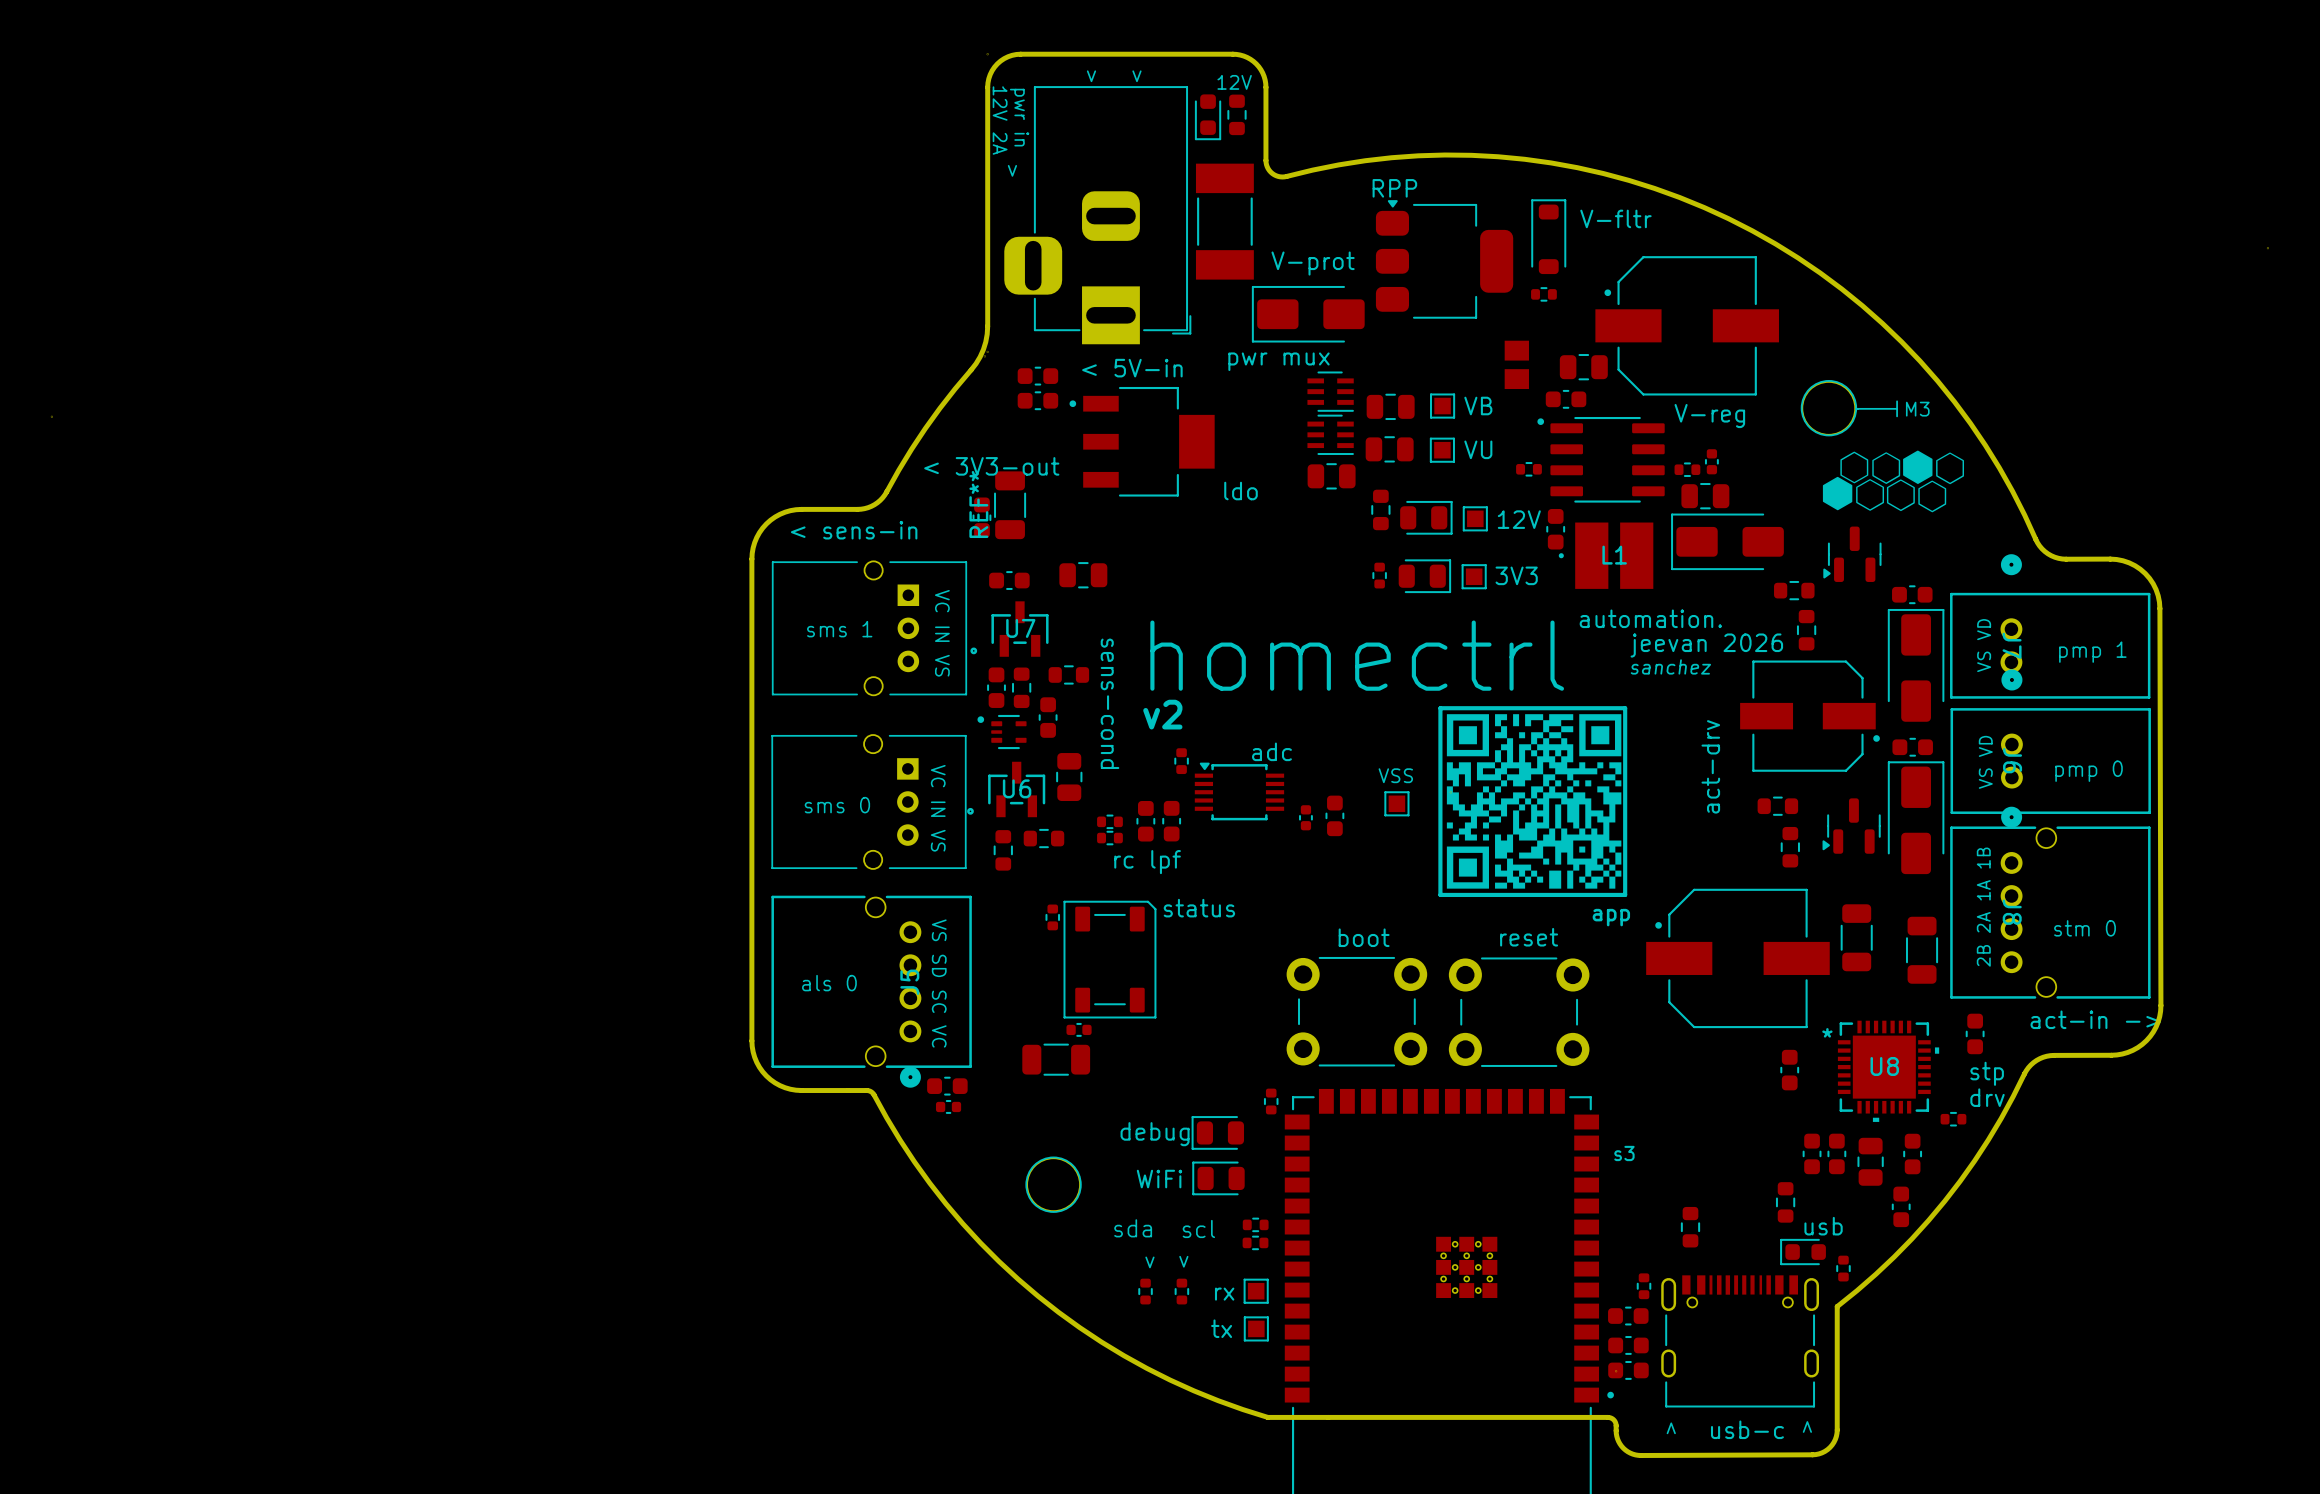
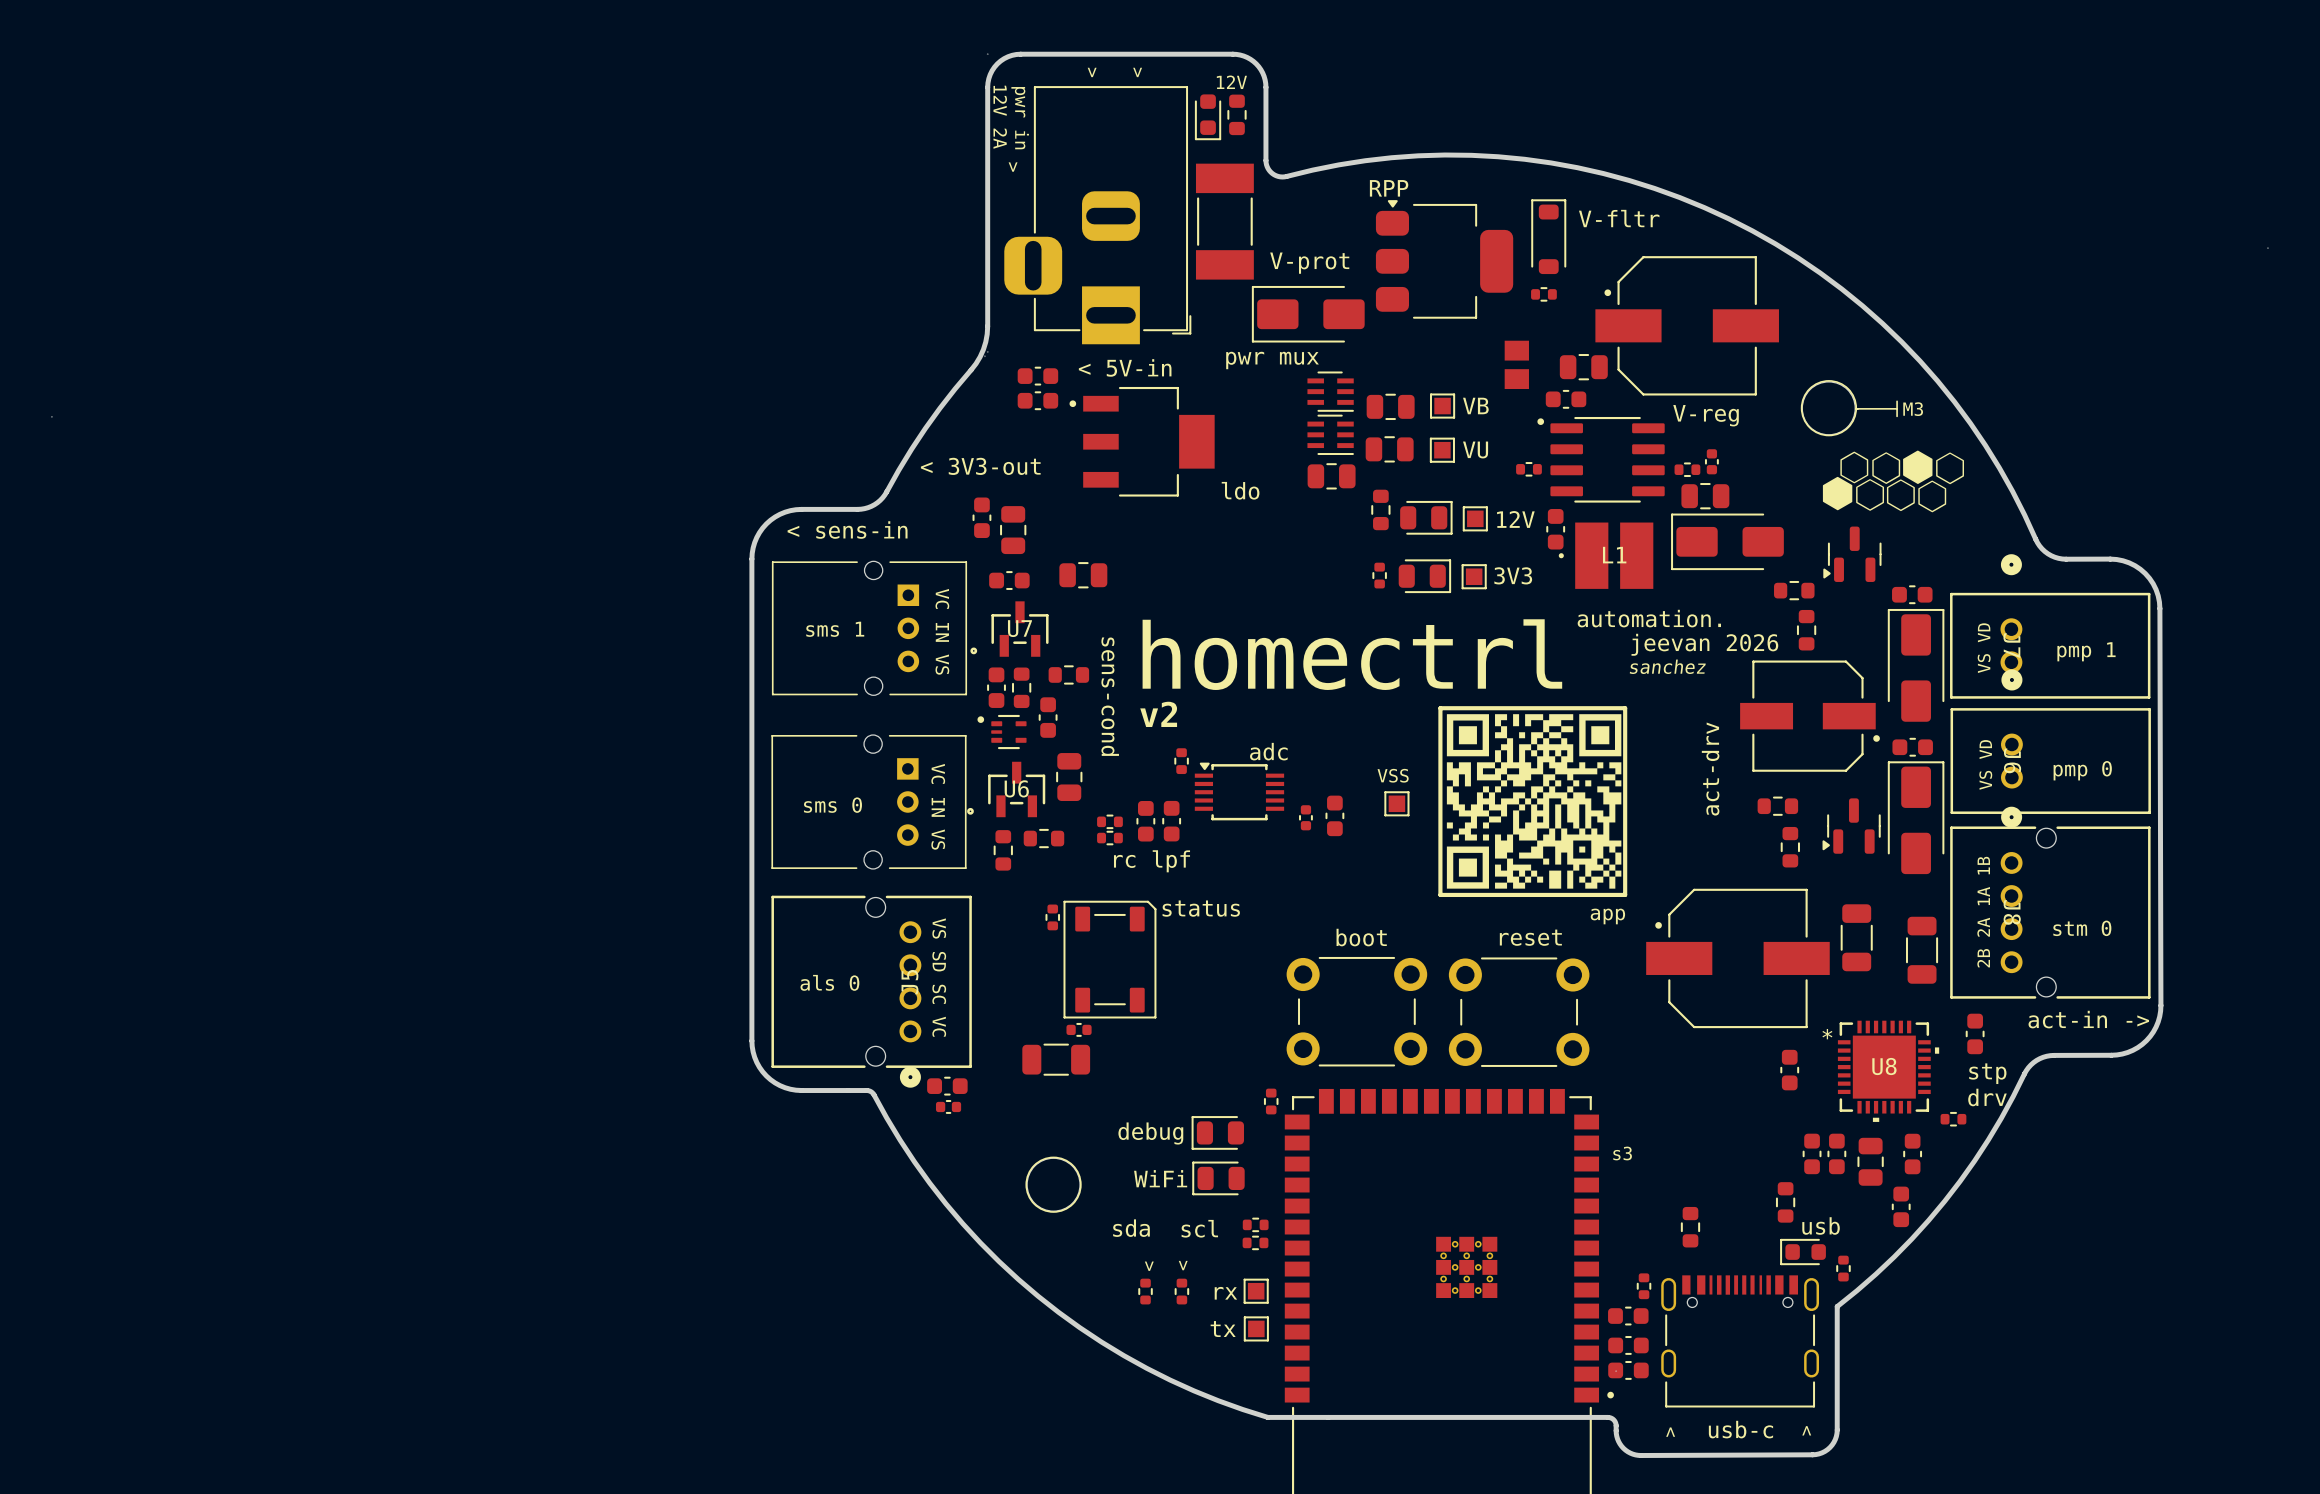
REF**: (1010, 505) -> none
part: none -> (1013, 530)

